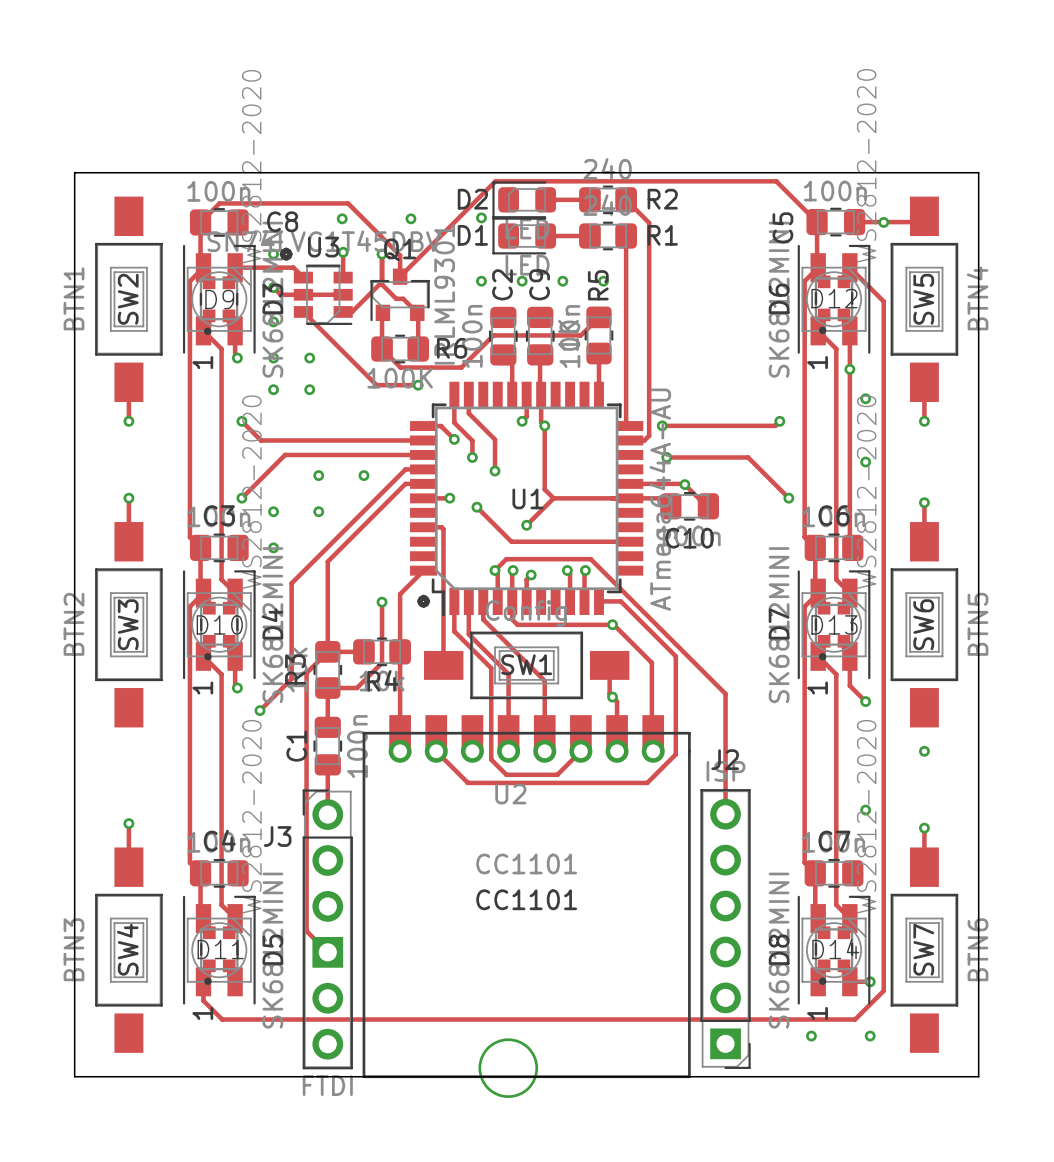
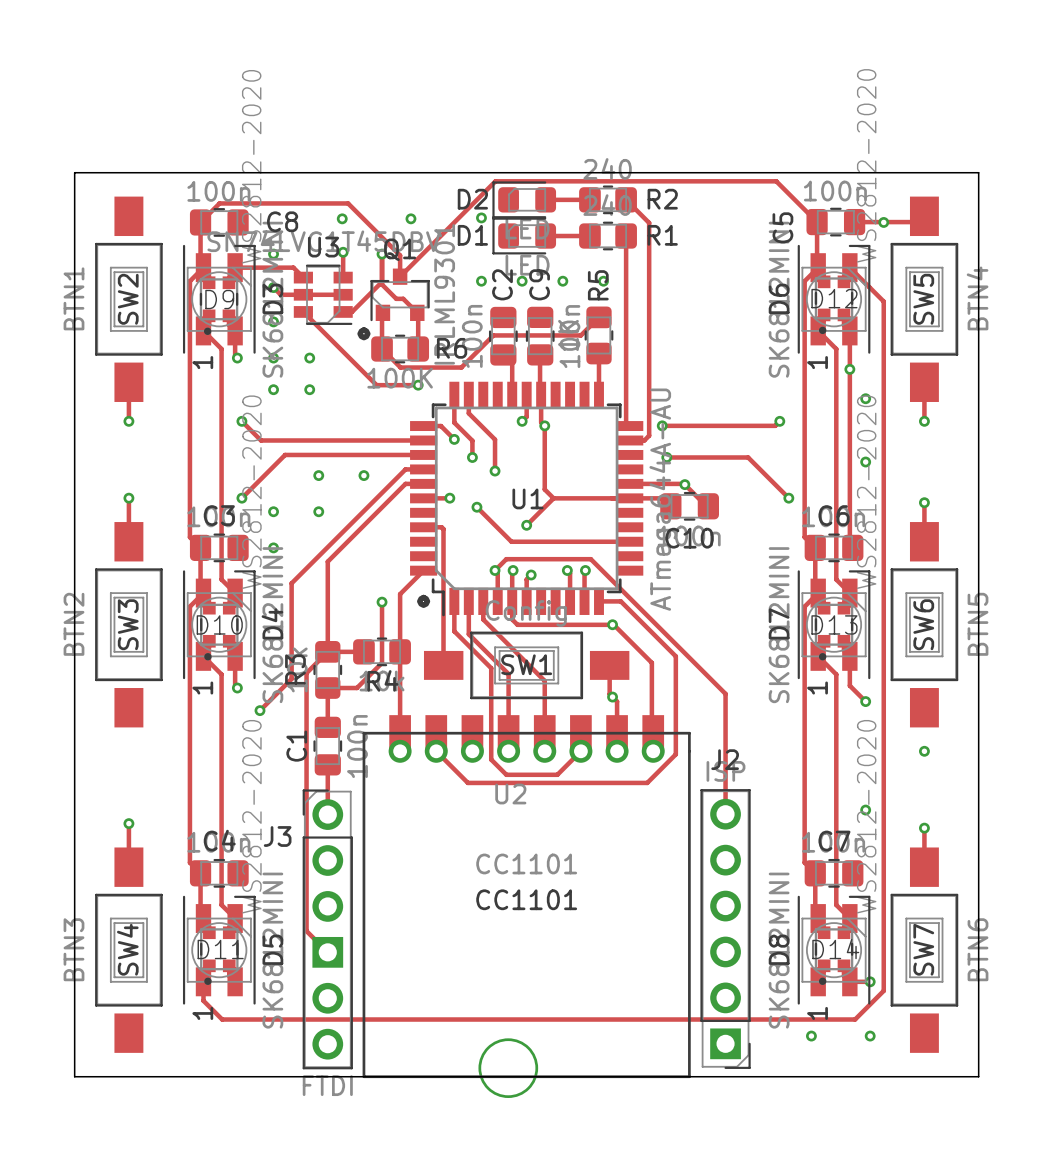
text position: ° (286, 254) -> ° (363, 333)

